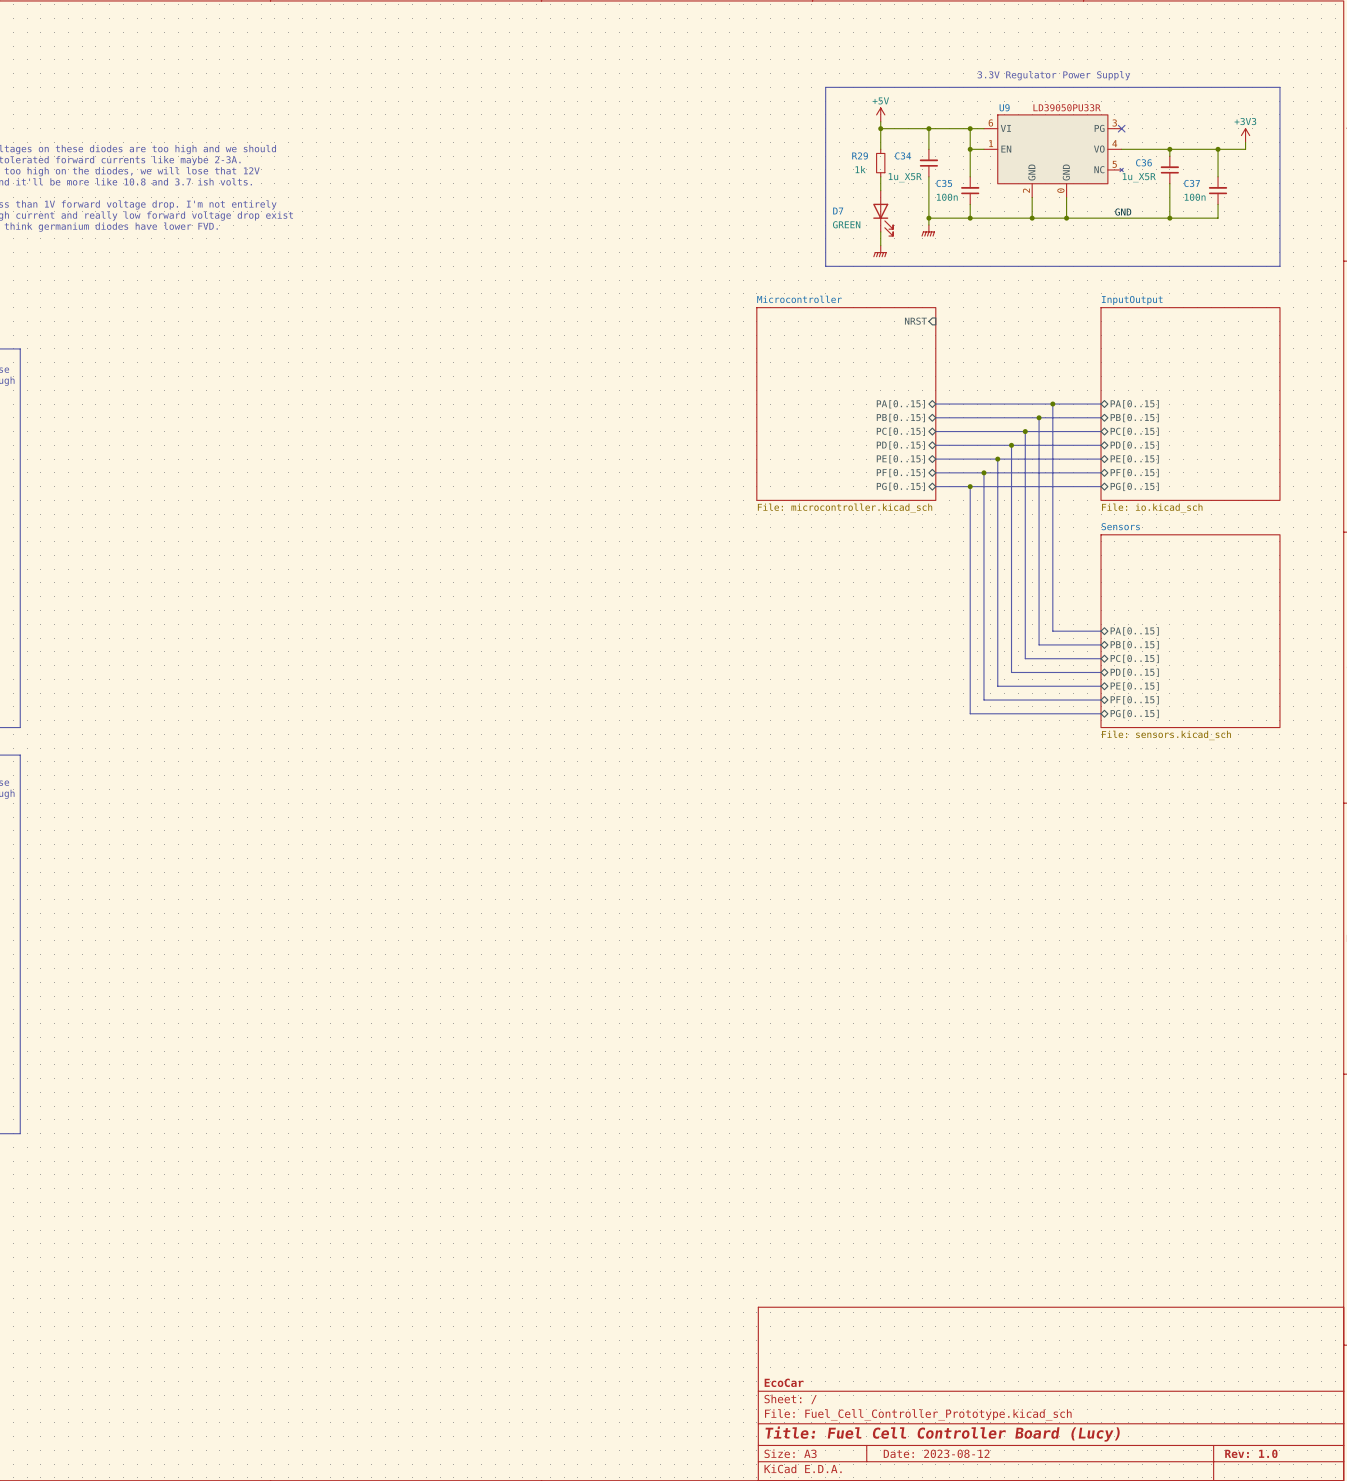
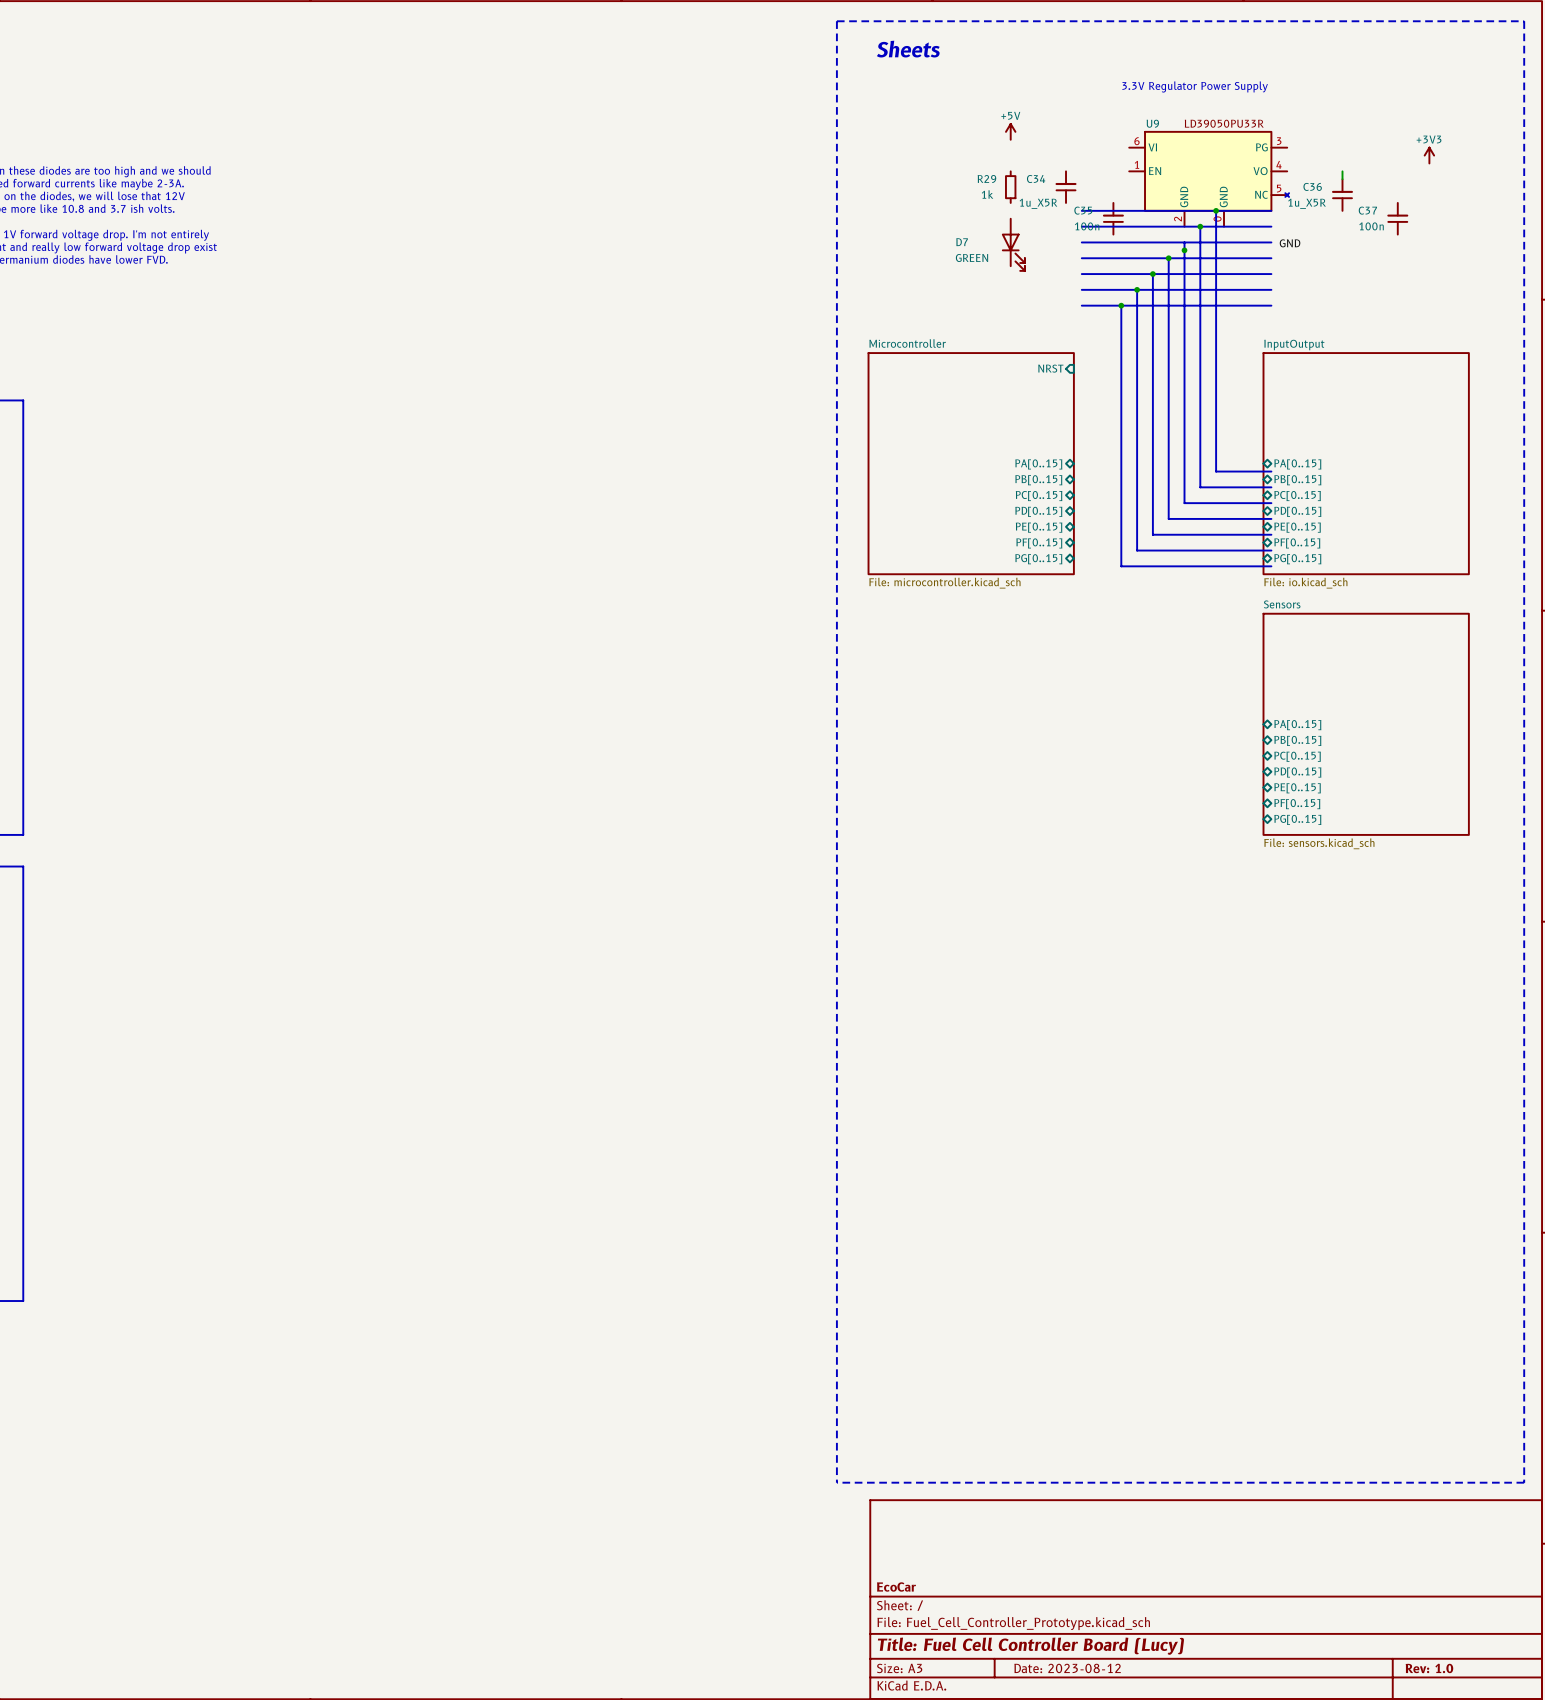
line: none -> (836, 21) (1524, 21) (1524, 1482) (836, 1482) (836, 21)
text: none -> Sheets (908, 49)
line: (825, 87) (825, 266) (1279, 266) (1279, 87) (825, 87) -> none
wire: (880, 121) (880, 149) -> none
wire: (880, 128) (983, 128) -> none
junction: (880, 128) -> none
wire: (928, 128) (928, 149) -> none
junction: (928, 128) -> none
wire: (970, 128) (970, 176) -> none
junction: (970, 128) -> none
no-connect mark: (1121, 128) -> none
wire: (1245, 142) (1245, 149) (1121, 149) -> none
wire: (970, 149) (983, 149) -> none
junction: (970, 149) -> none
junction: (1169, 149) -> none
wire: (1218, 149) (1218, 176) -> none
junction: (1218, 149) -> none
wire: (880, 176) (880, 190) -> none
wire: (928, 176) (928, 225) -> none
bus: none -> (1081, 210) (1271, 210)
bus: none -> (1216, 210) (1216, 471) (1271, 471)
junction: none -> (1216, 210)
wire: (1169, 183) (1169, 218) -> none
bus: none -> (1081, 226) (1271, 226)
wire: (1032, 197) (1032, 218) -> none
bus: none -> (1200, 226) (1200, 487) (1271, 487)
junction: none -> (1200, 226)
wire: (1066, 197) (1066, 218) -> none
wire: (970, 204) (970, 218) -> none
wire: (1218, 204) (1218, 218) (928, 218) -> none
bus: none -> (1081, 242) (1271, 242)
bus: none -> (1184, 242) (1184, 503) (1271, 503)
junction: (928, 218) -> none
junction: (970, 218) -> none
junction: (1066, 218) -> none
junction: (1169, 218) -> none
bus: none -> (1081, 258) (1271, 258)
bus: none -> (1168, 258) (1168, 518) (1271, 518)
junction: none -> (1168, 258)
power symbol: (928, 230) -> none
wire: (880, 231) (880, 245) -> none
bus: none -> (1081, 274) (1271, 274)
bus: none -> (1152, 274) (1152, 534) (1271, 534)
junction: none -> (1152, 274)
power symbol: (880, 251) -> none
bus: none -> (1081, 289) (1271, 289)
bus: none -> (1137, 289) (1137, 550) (1271, 550)
junction: none -> (1137, 289)
bus: none -> (1081, 305) (1271, 305)
bus: none -> (1121, 305) (1121, 566) (1271, 566)
junction: none -> (1121, 305)
bus: (935, 404) (1101, 404) -> none
bus: (1052, 404) (1052, 631) (1101, 631) -> none
junction: (1052, 404) -> none
bus: (935, 417) (1101, 417) -> none
bus: (1039, 417) (1039, 644) (1101, 644) -> none
junction: (1039, 417) -> none
bus: (935, 431) (1101, 431) -> none
bus: (1025, 431) (1025, 658) (1101, 658) -> none
junction: (1025, 431) -> none
bus: (935, 445) (1101, 445) -> none
bus: (1011, 445) (1011, 672) (1101, 672) -> none
junction: (1011, 445) -> none
bus: (935, 459) (1101, 459) -> none
bus: (997, 459) (997, 686) (1101, 686) -> none
junction: (997, 459) -> none
bus: (935, 472) (1101, 472) -> none
bus: (983, 472) (983, 700) (1101, 700) -> none
junction: (983, 472) -> none
bus: (935, 486) (1101, 486) -> none
bus: (970, 486) (970, 713) (1101, 713) -> none
junction: (970, 486) -> none

